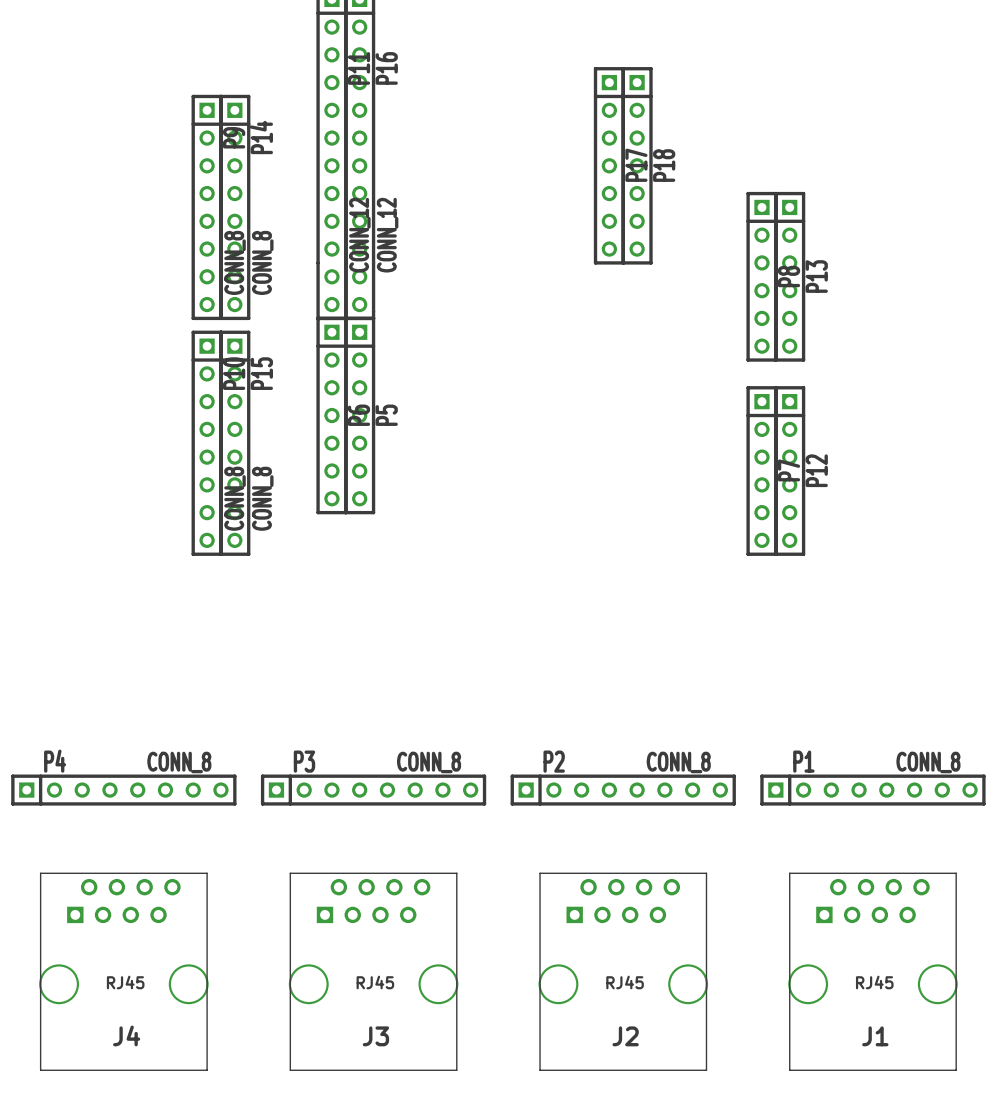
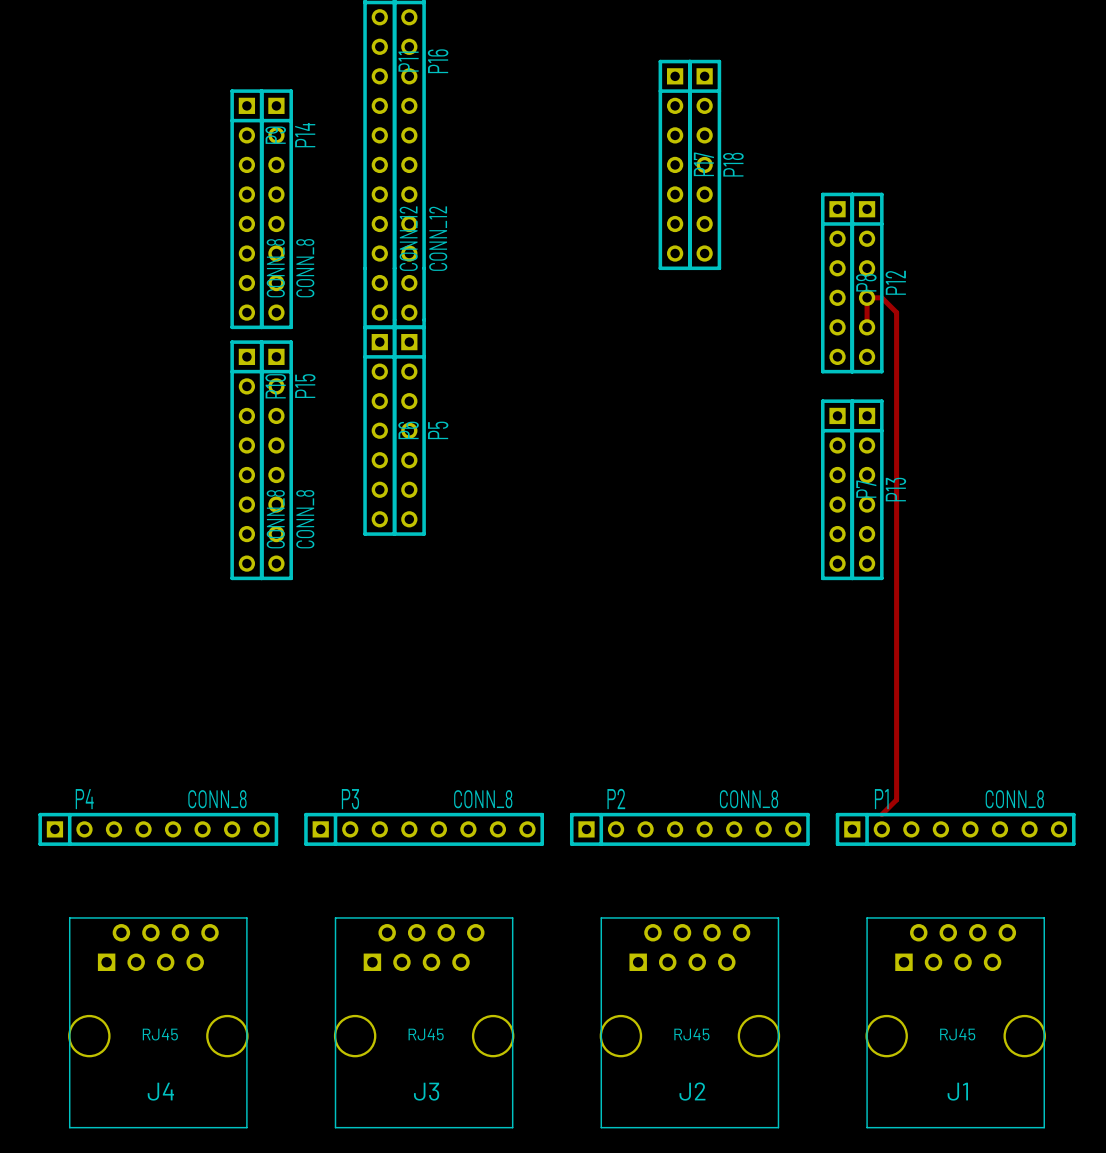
P13 name: P13 (816, 276) -> P12 (895, 282)
track: none -> (867, 327) (867, 297) (881, 297) (896, 312) (896, 799) (881, 814)
P12 name: P12 (816, 470) -> P13 (895, 489)

